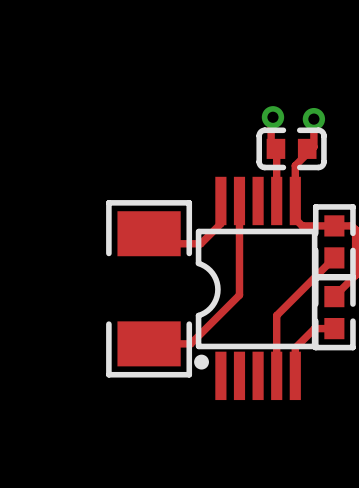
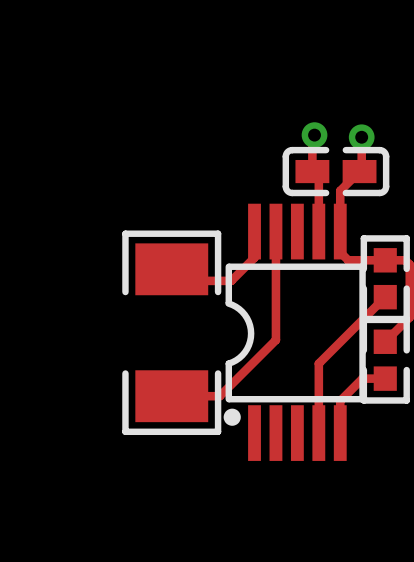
part footprint: [256, 127, 327, 171] -> [282, 146, 390, 197]

